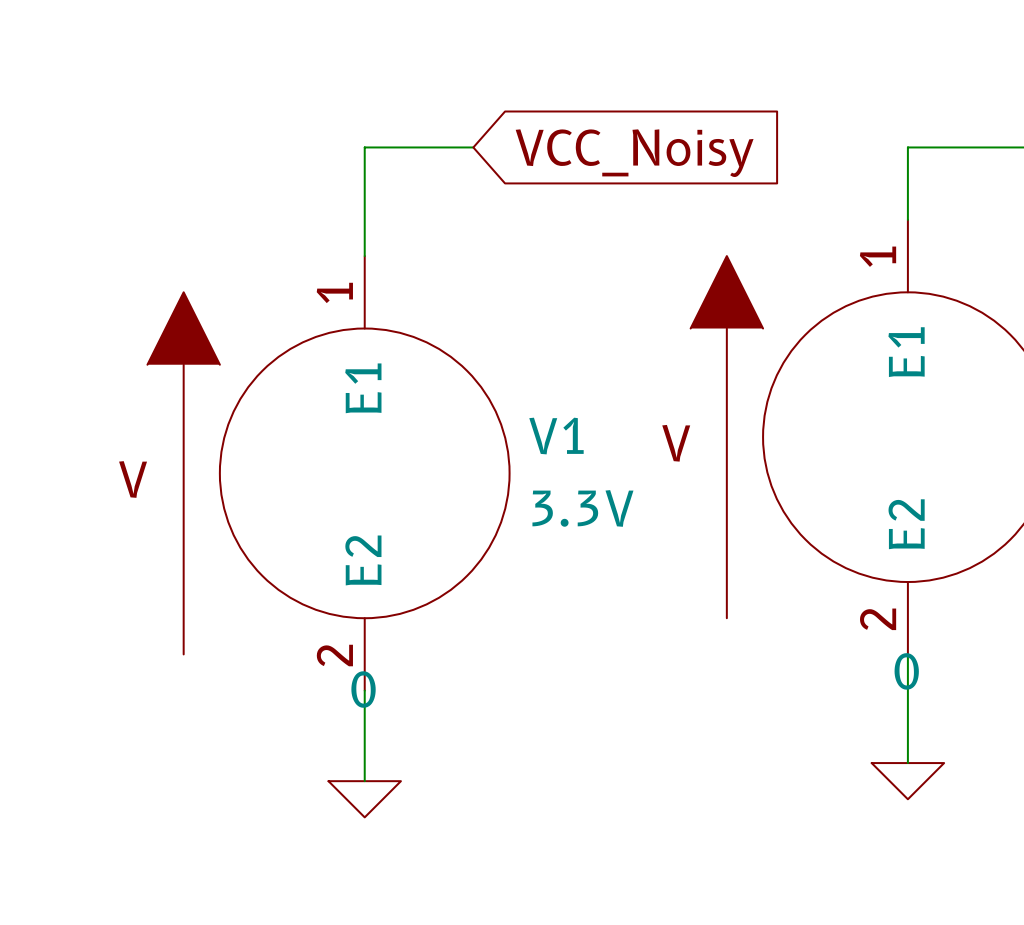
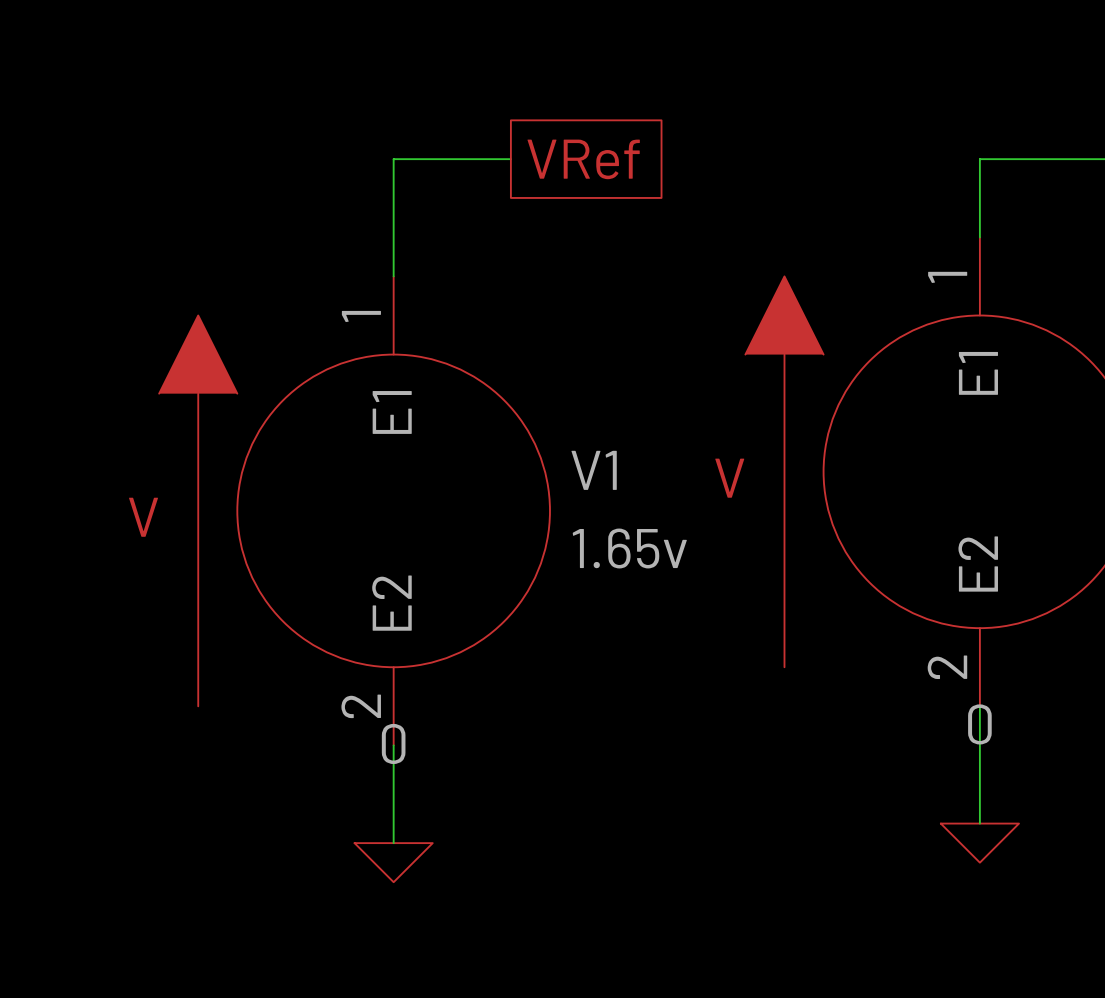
global label shape: input (634, 153) -> passive (583, 159)
global label: VCC_Noisy (634, 153) -> VRef (583, 159)
V1 value: 3.3V (582, 508) -> 1.65v (629, 548)

